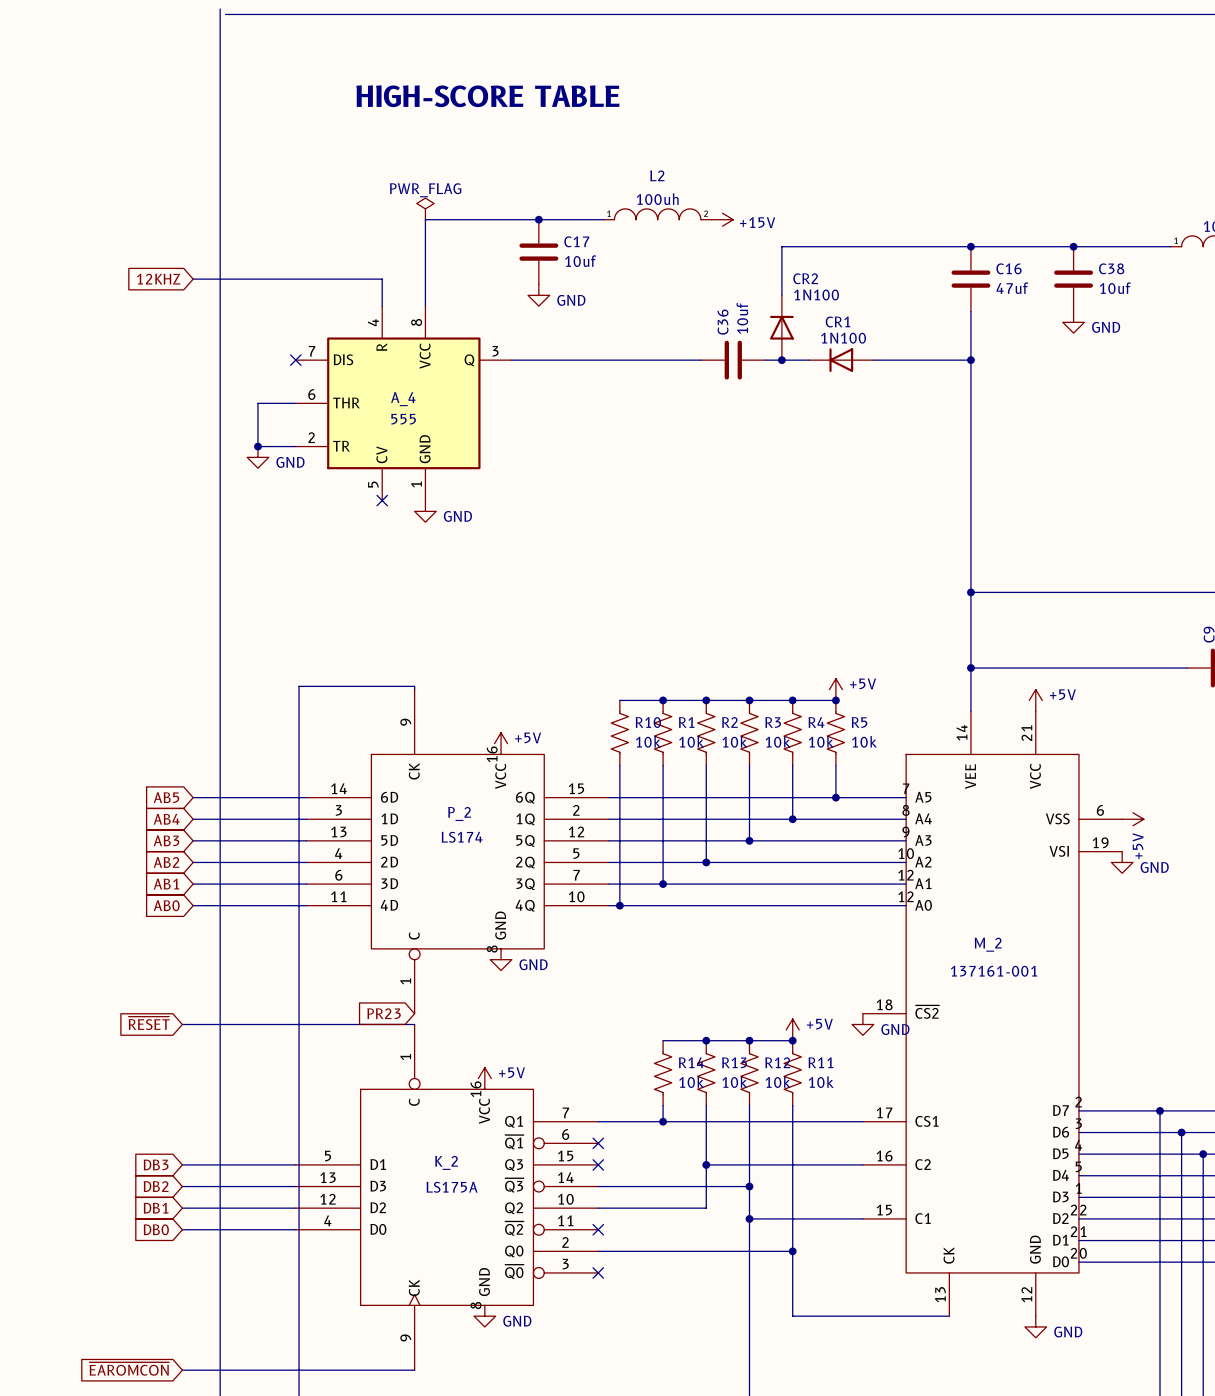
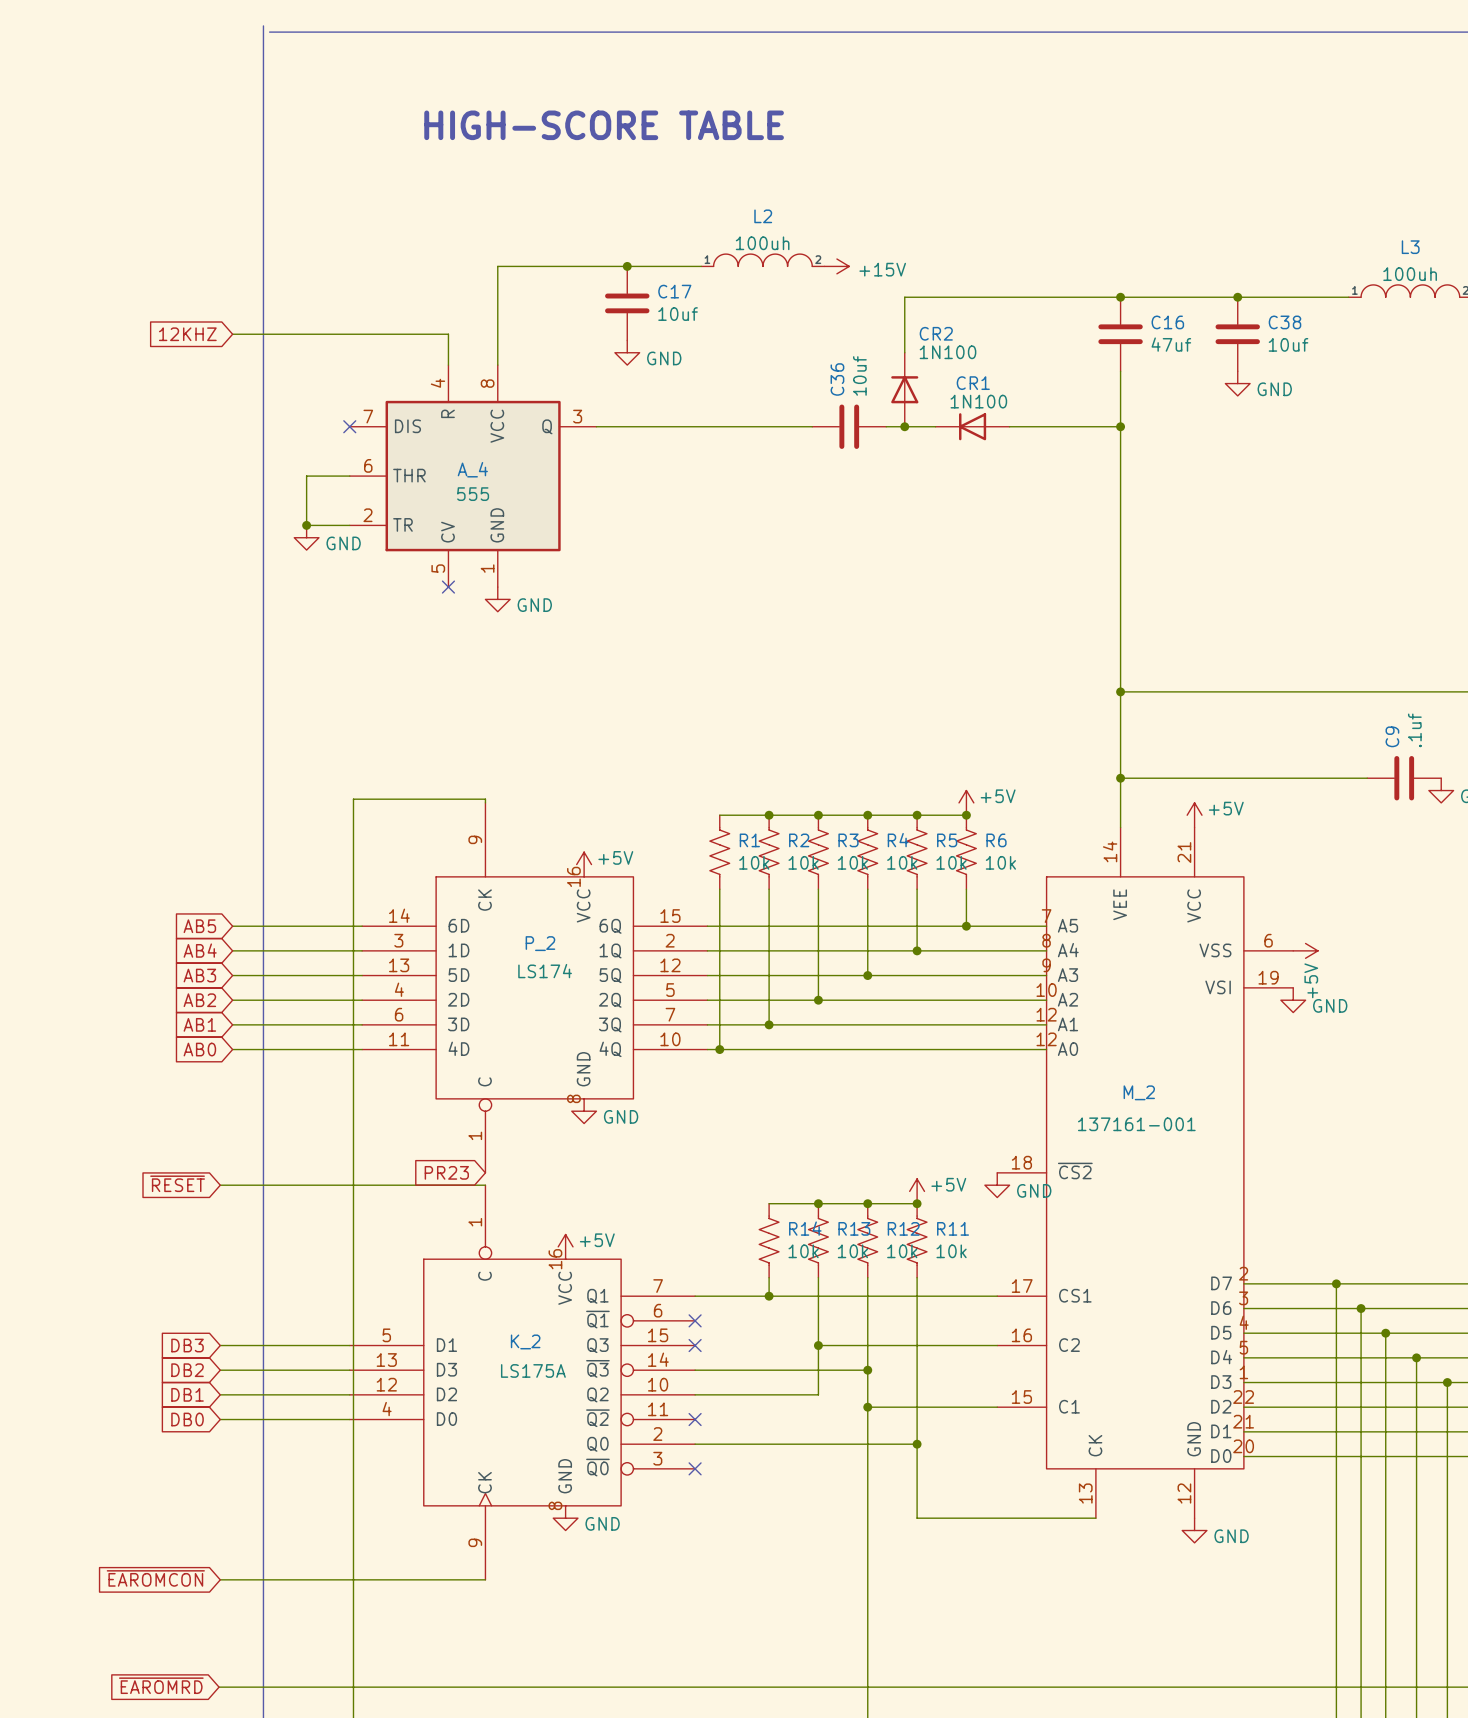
power symbol: PWR_FLAG (425, 208) -> none
R10 name: R10 (648, 722) -> R1 (749, 840)
R1 name: R1 (686, 722) -> R2 (799, 840)
R2 name: R2 (729, 722) -> R3 (848, 840)
R3 name: R3 (773, 722) -> R4 (898, 840)
R4 name: R4 (816, 722) -> R5 (947, 840)
R5 name: R5 (859, 722) -> R6 (996, 840)

